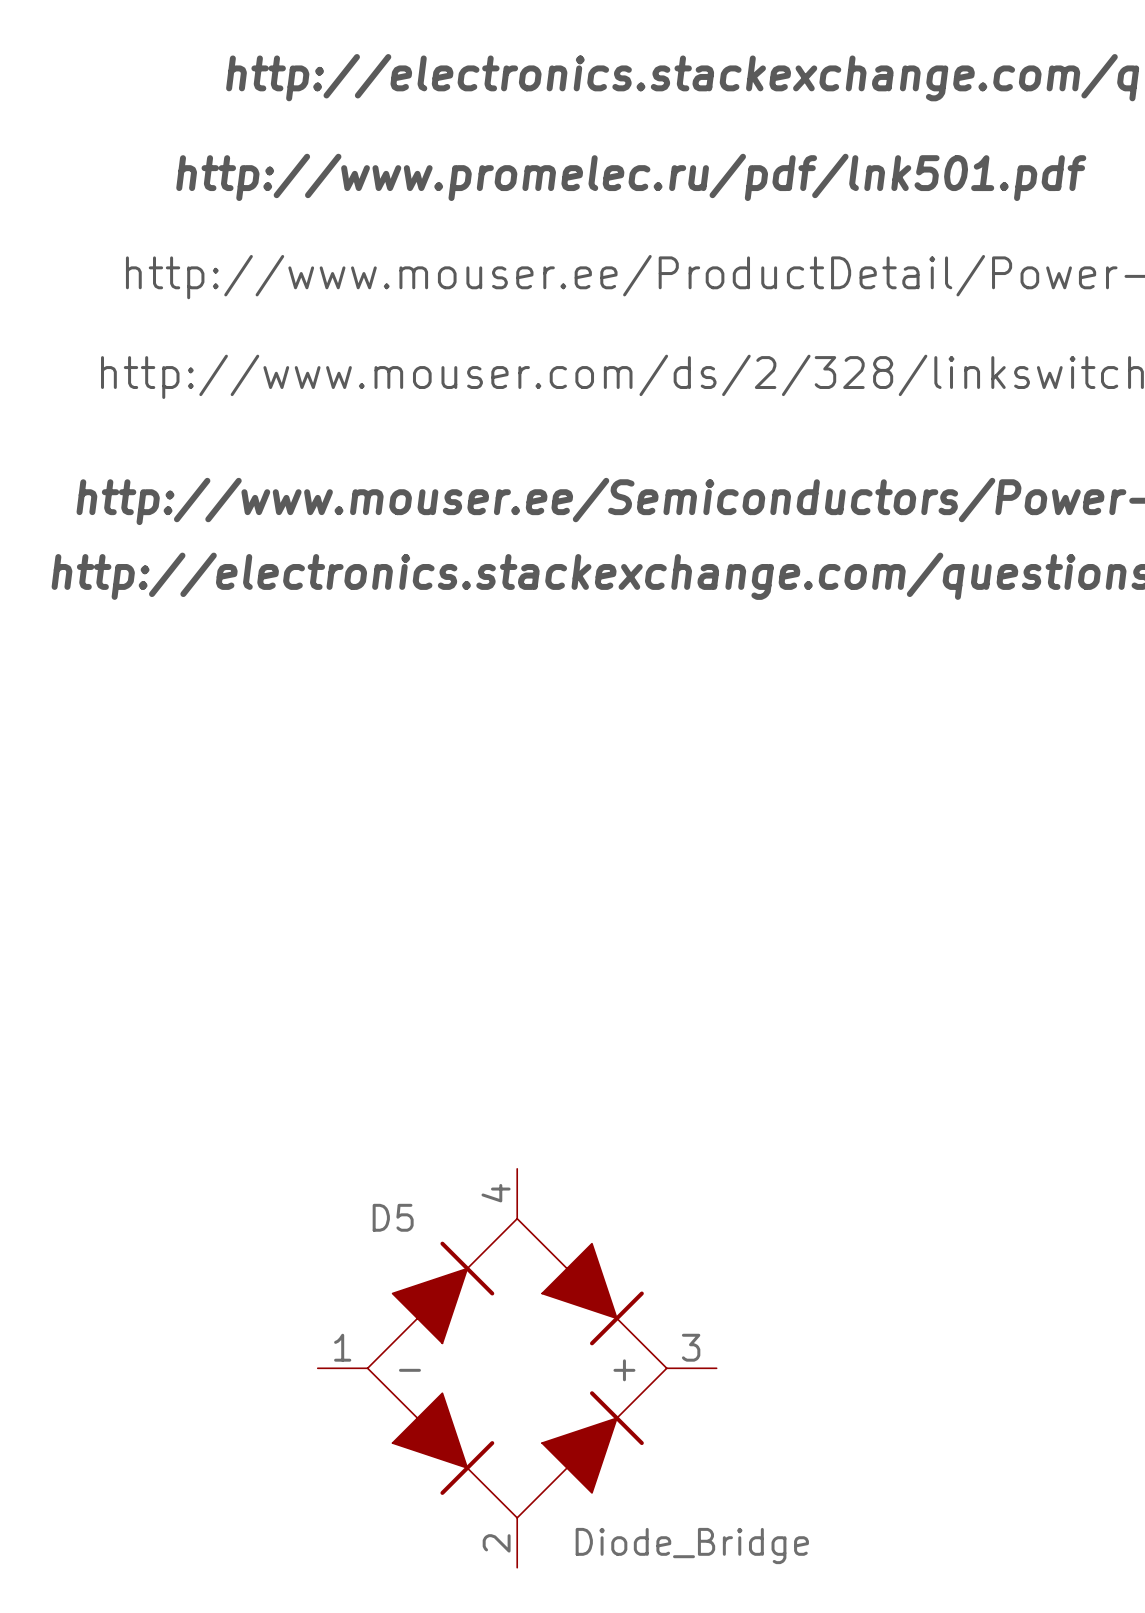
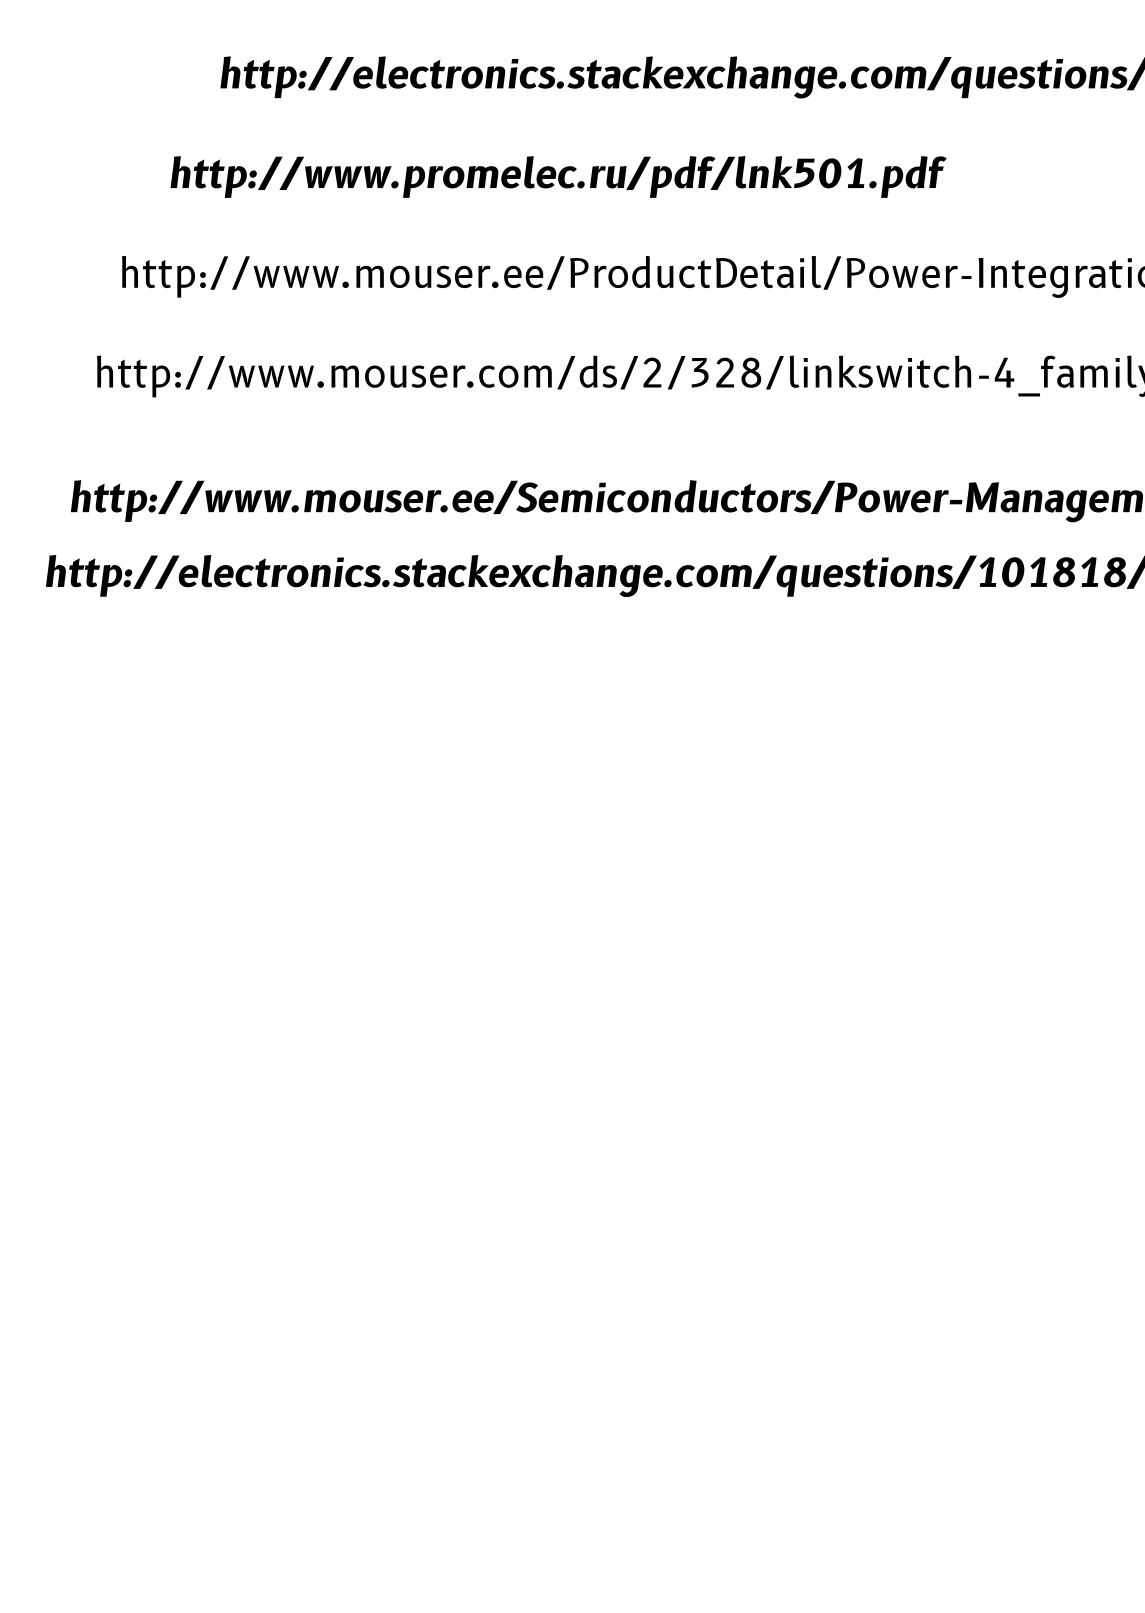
D5: Diode_Bridge (517, 1368) -> none

